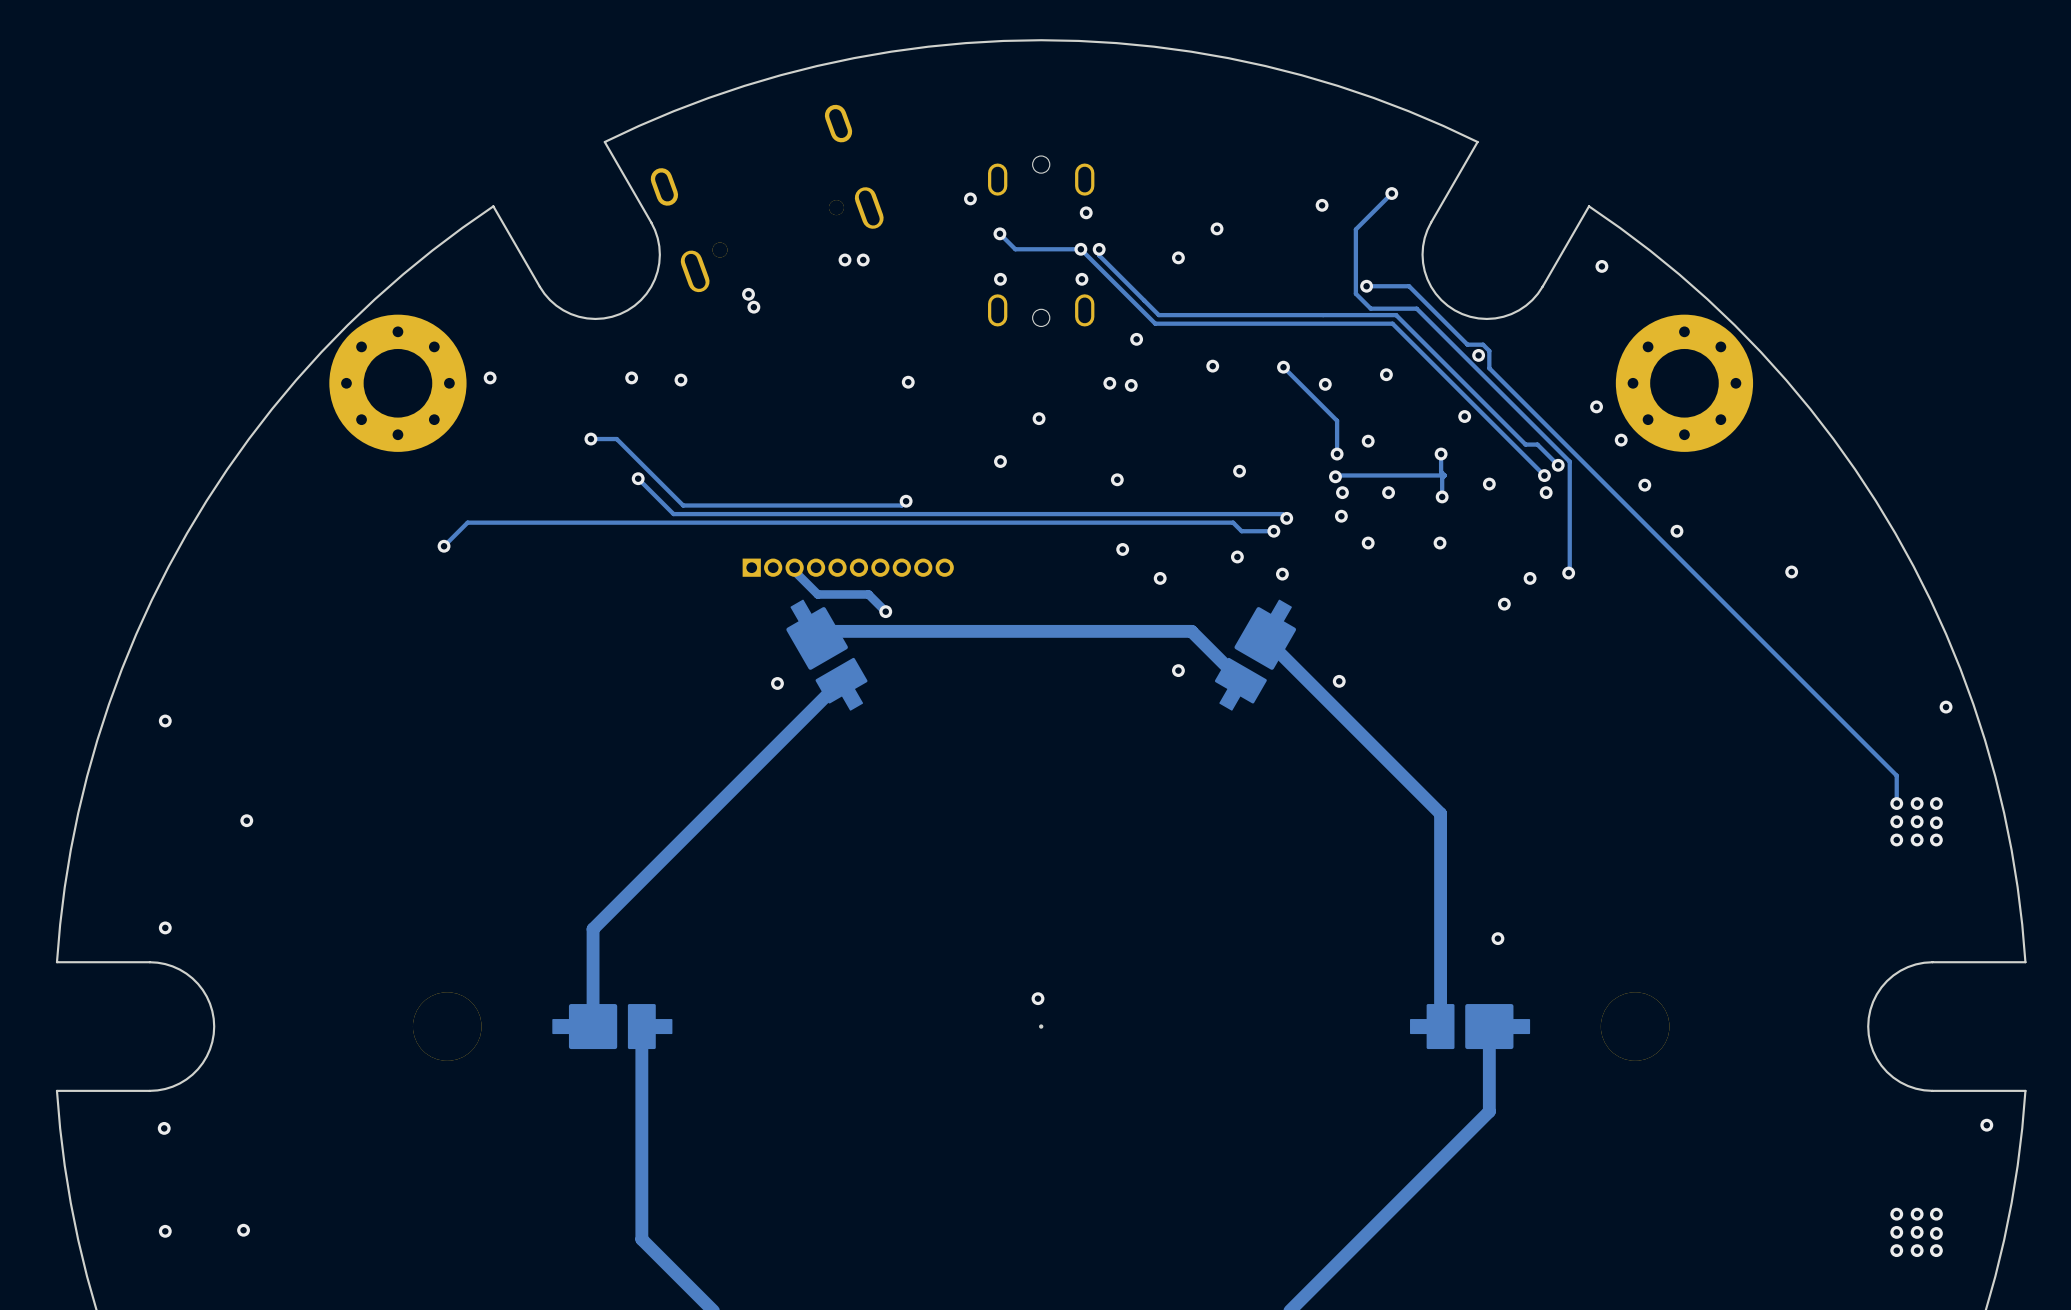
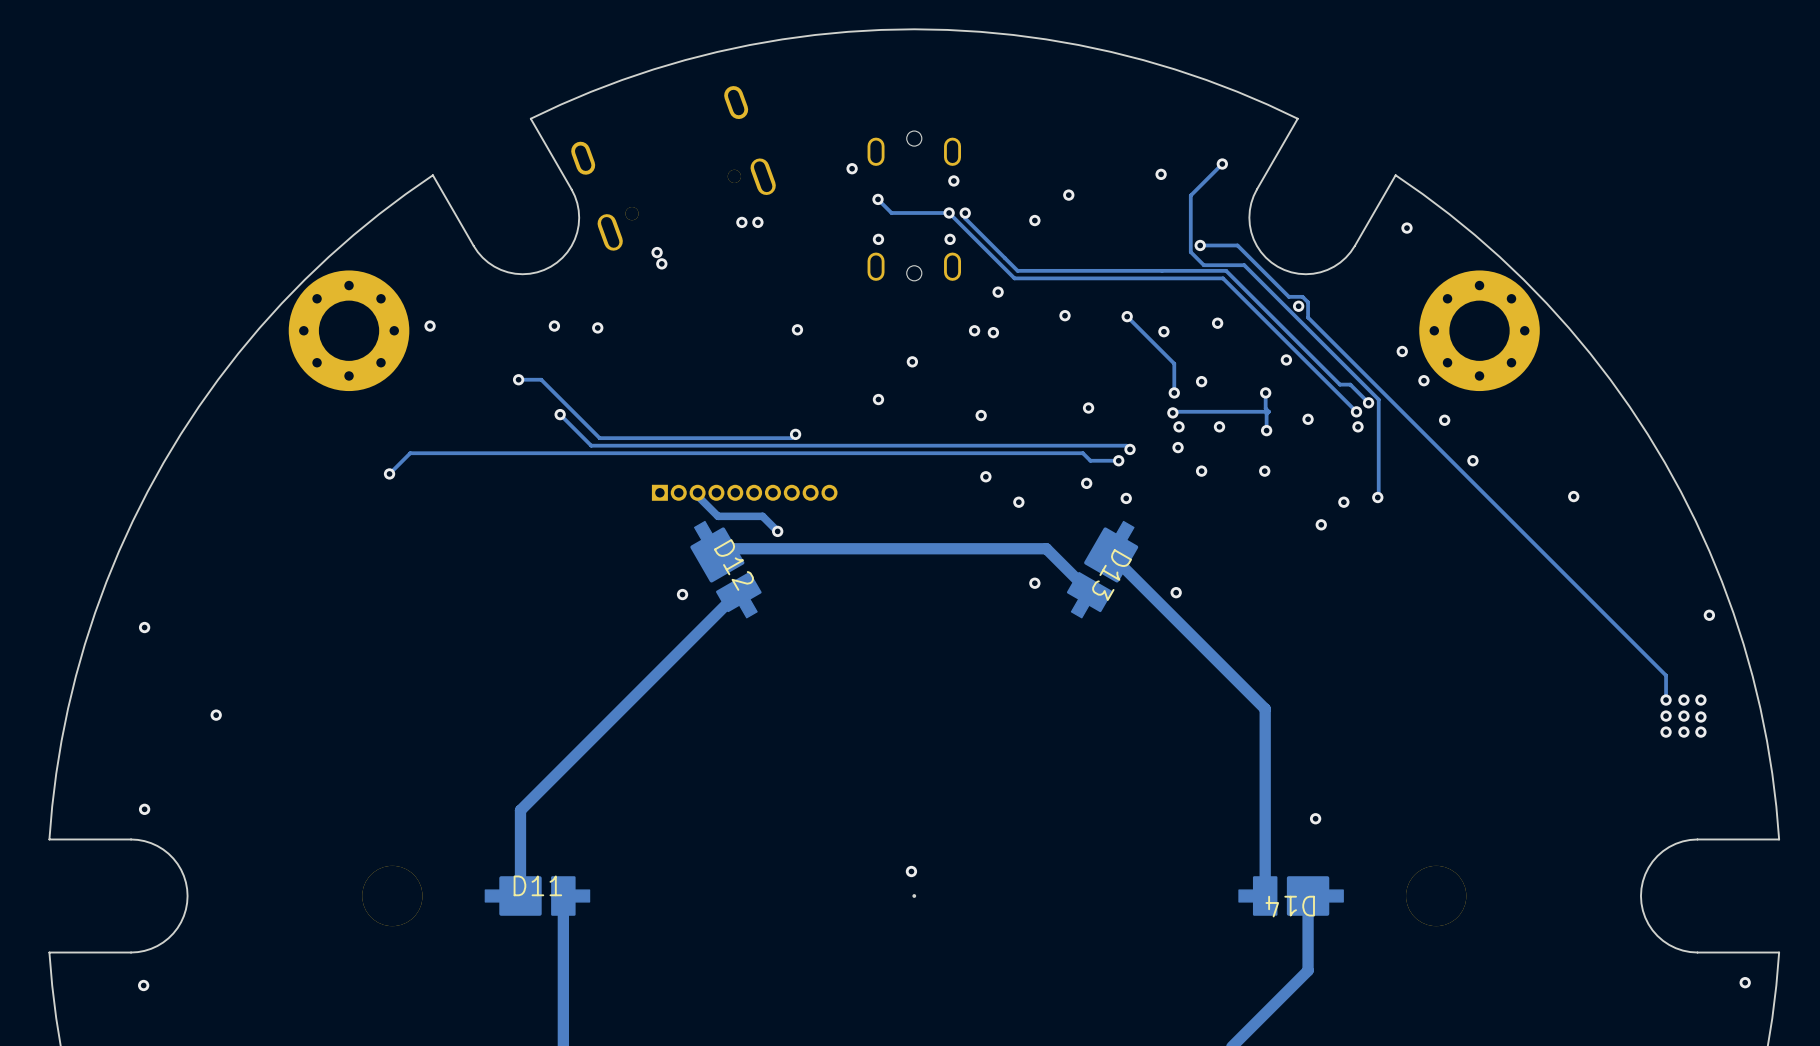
D12 name: none -> D12 (734, 564)
D13 name: none -> D13 (1112, 575)
D11 name: none -> D11 (537, 885)
D14 name: none -> D14 (1290, 906)

